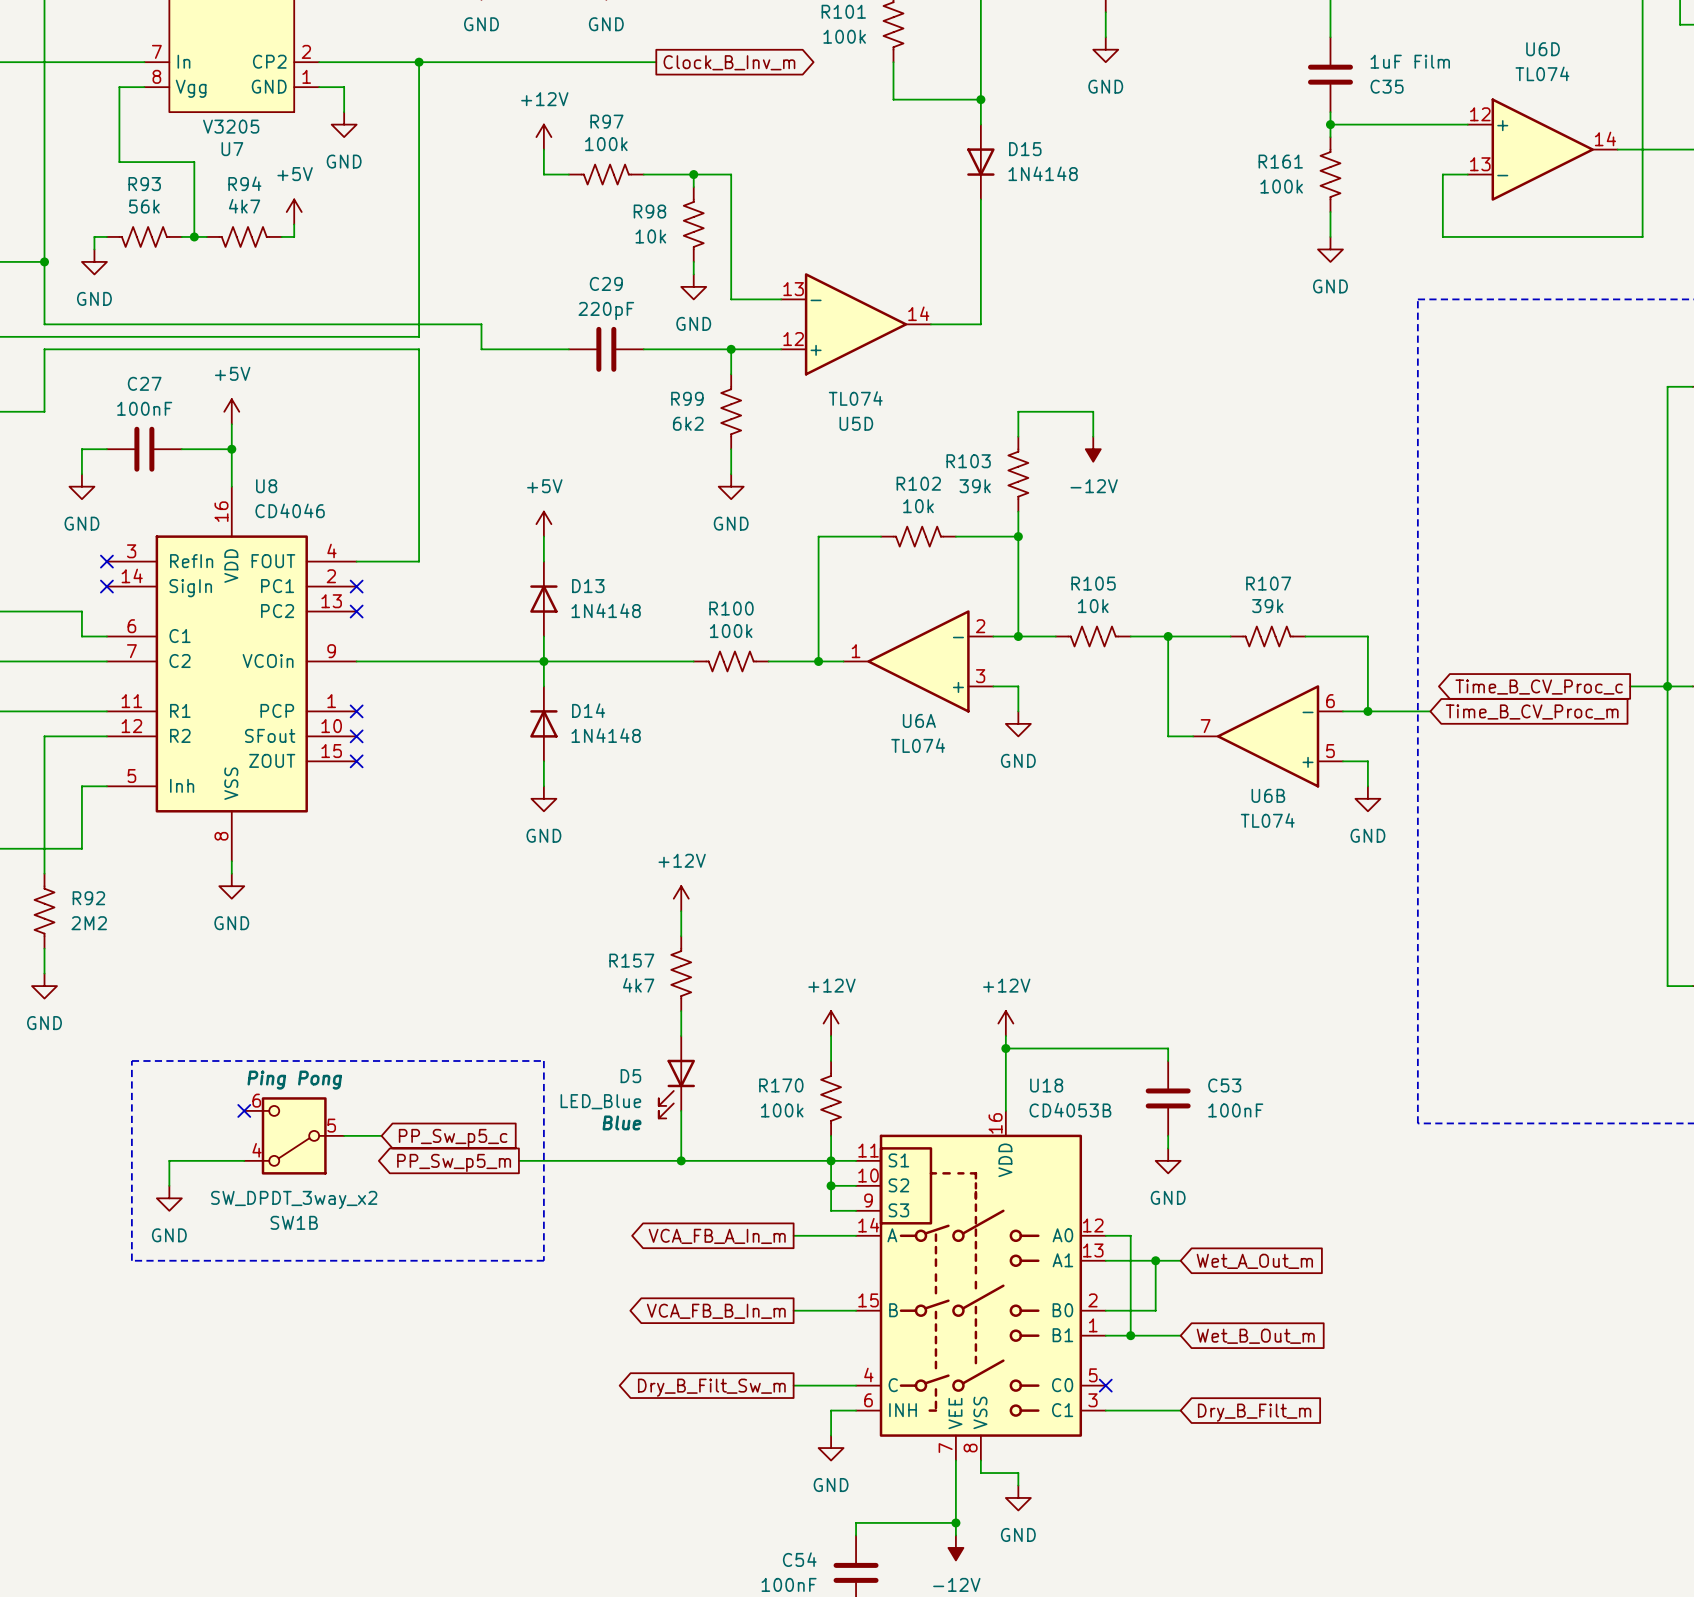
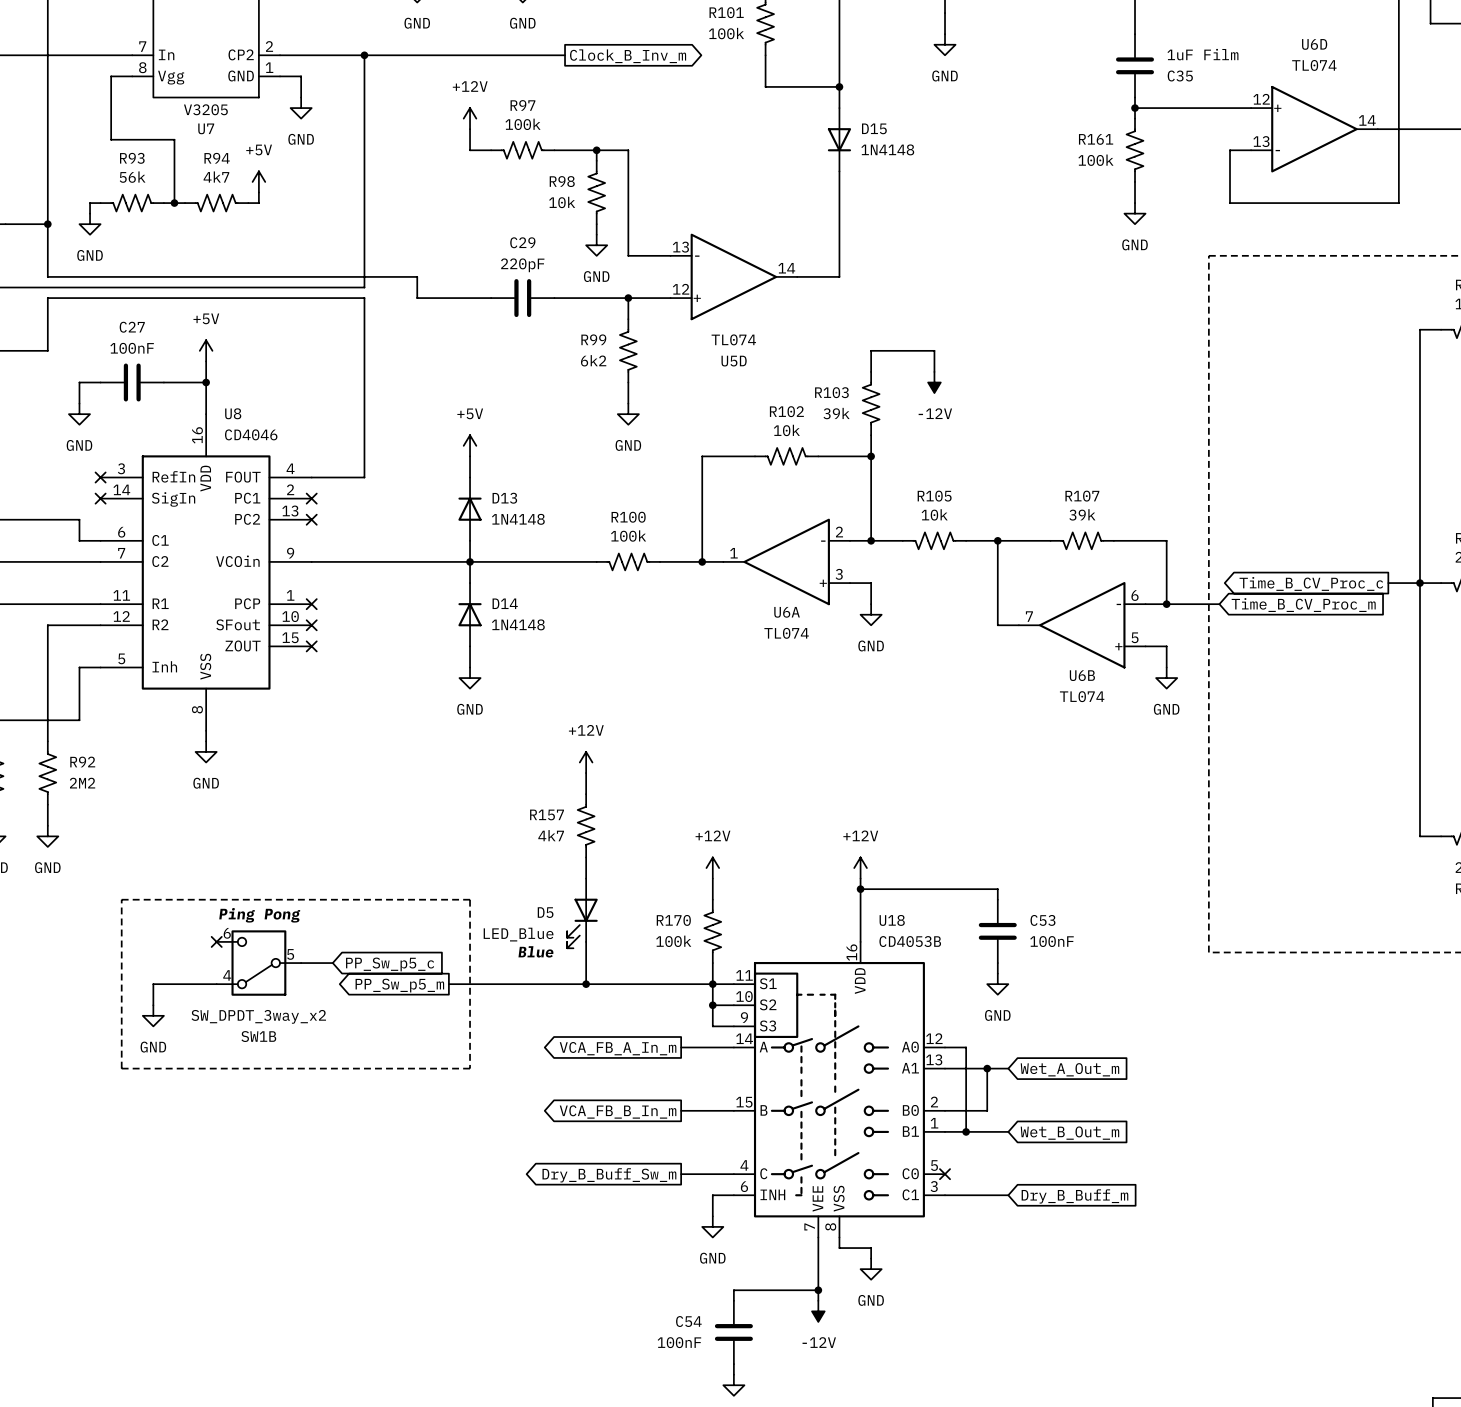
global label: Dry_B_Filt_Sw_m (711, 1387) -> Dry_B_Buff_Sw_m (609, 1175)
global label: Dry_B_Filt_m (1254, 1412) -> Dry_B_Buff_m (1074, 1196)

